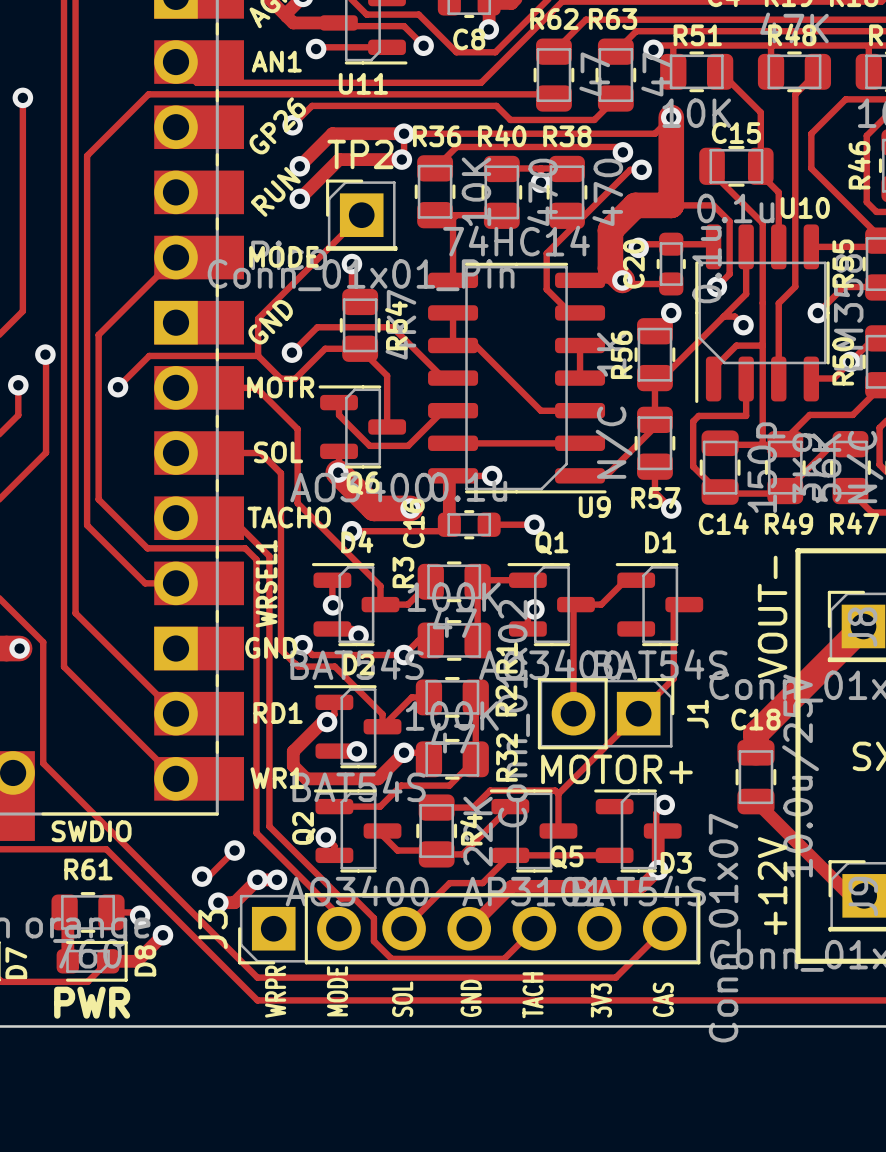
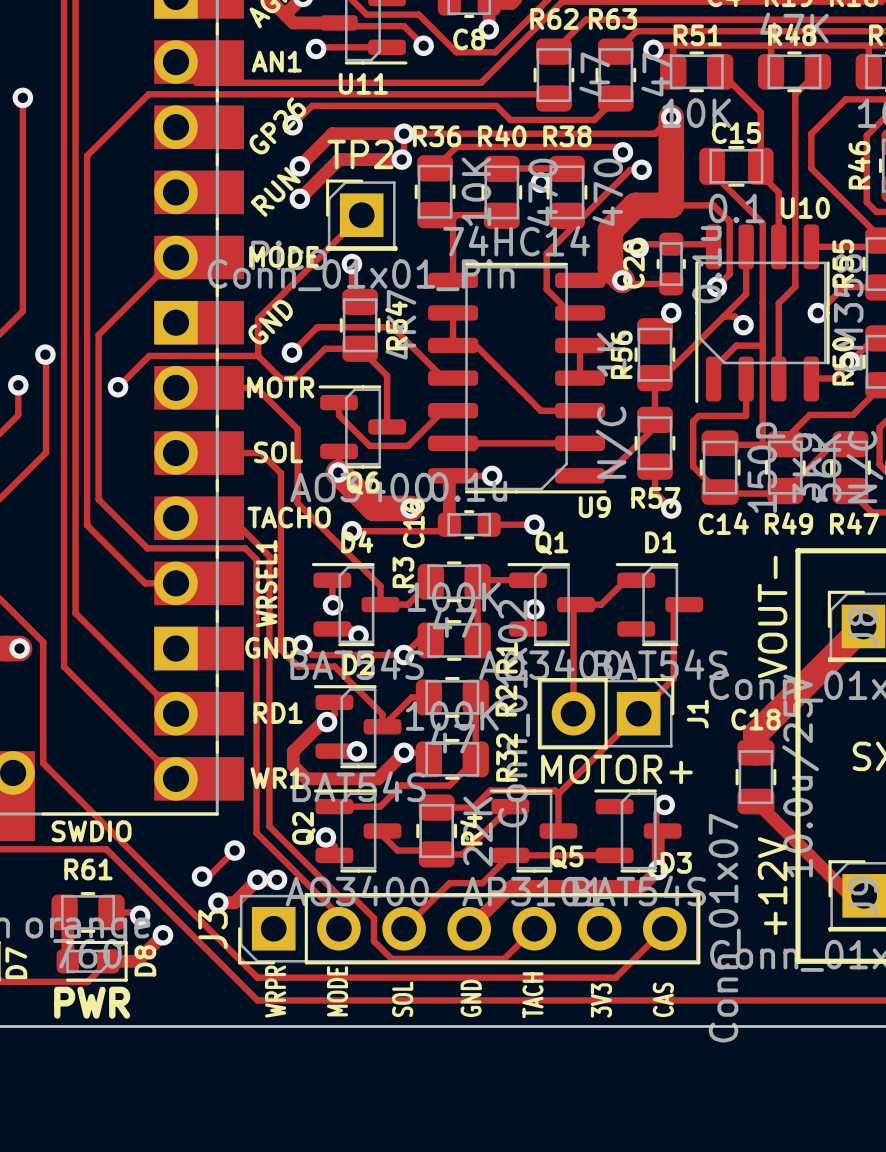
C15 value: 0.1u (735, 208) -> 0.1 (736, 208)

